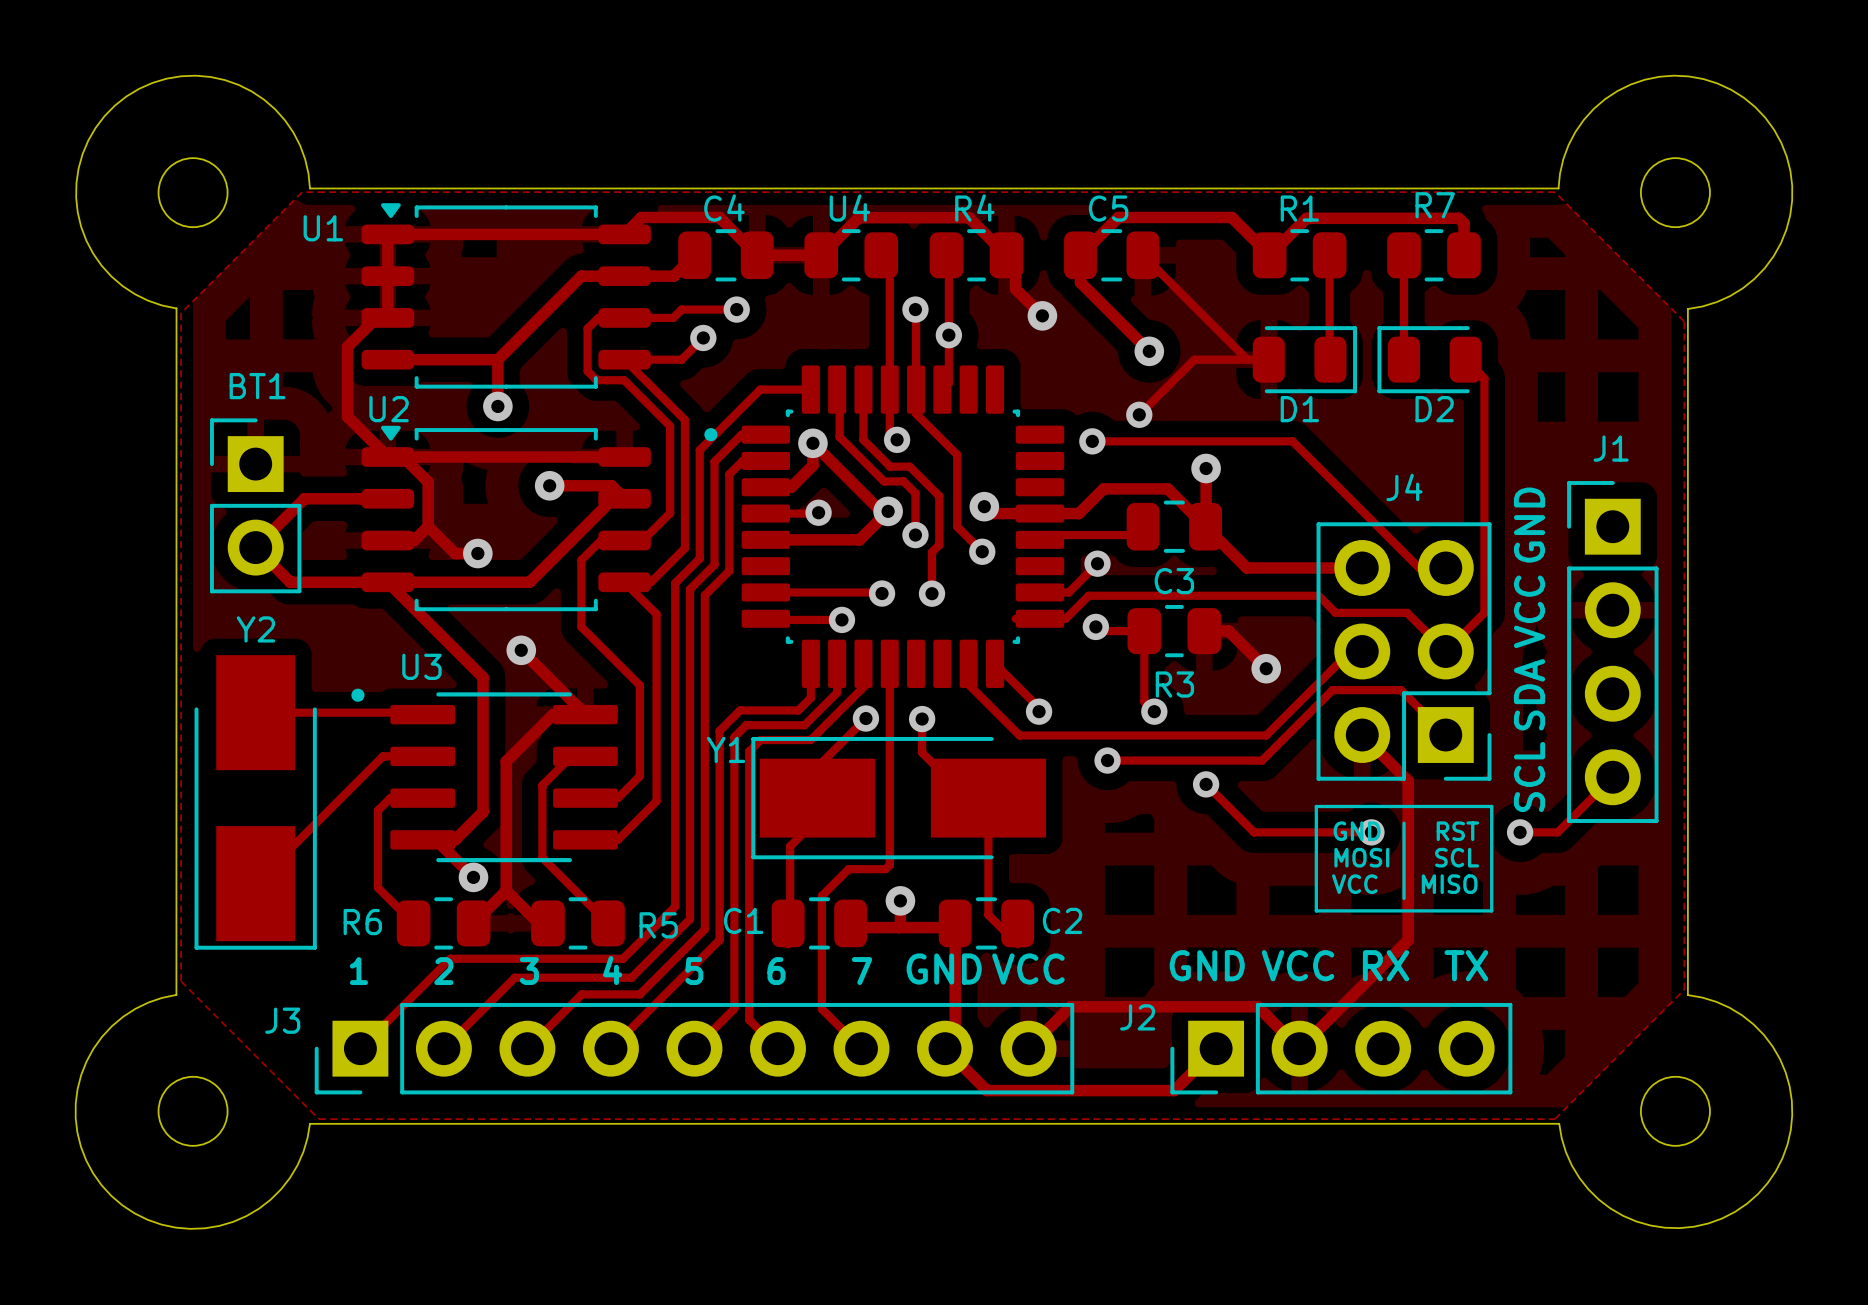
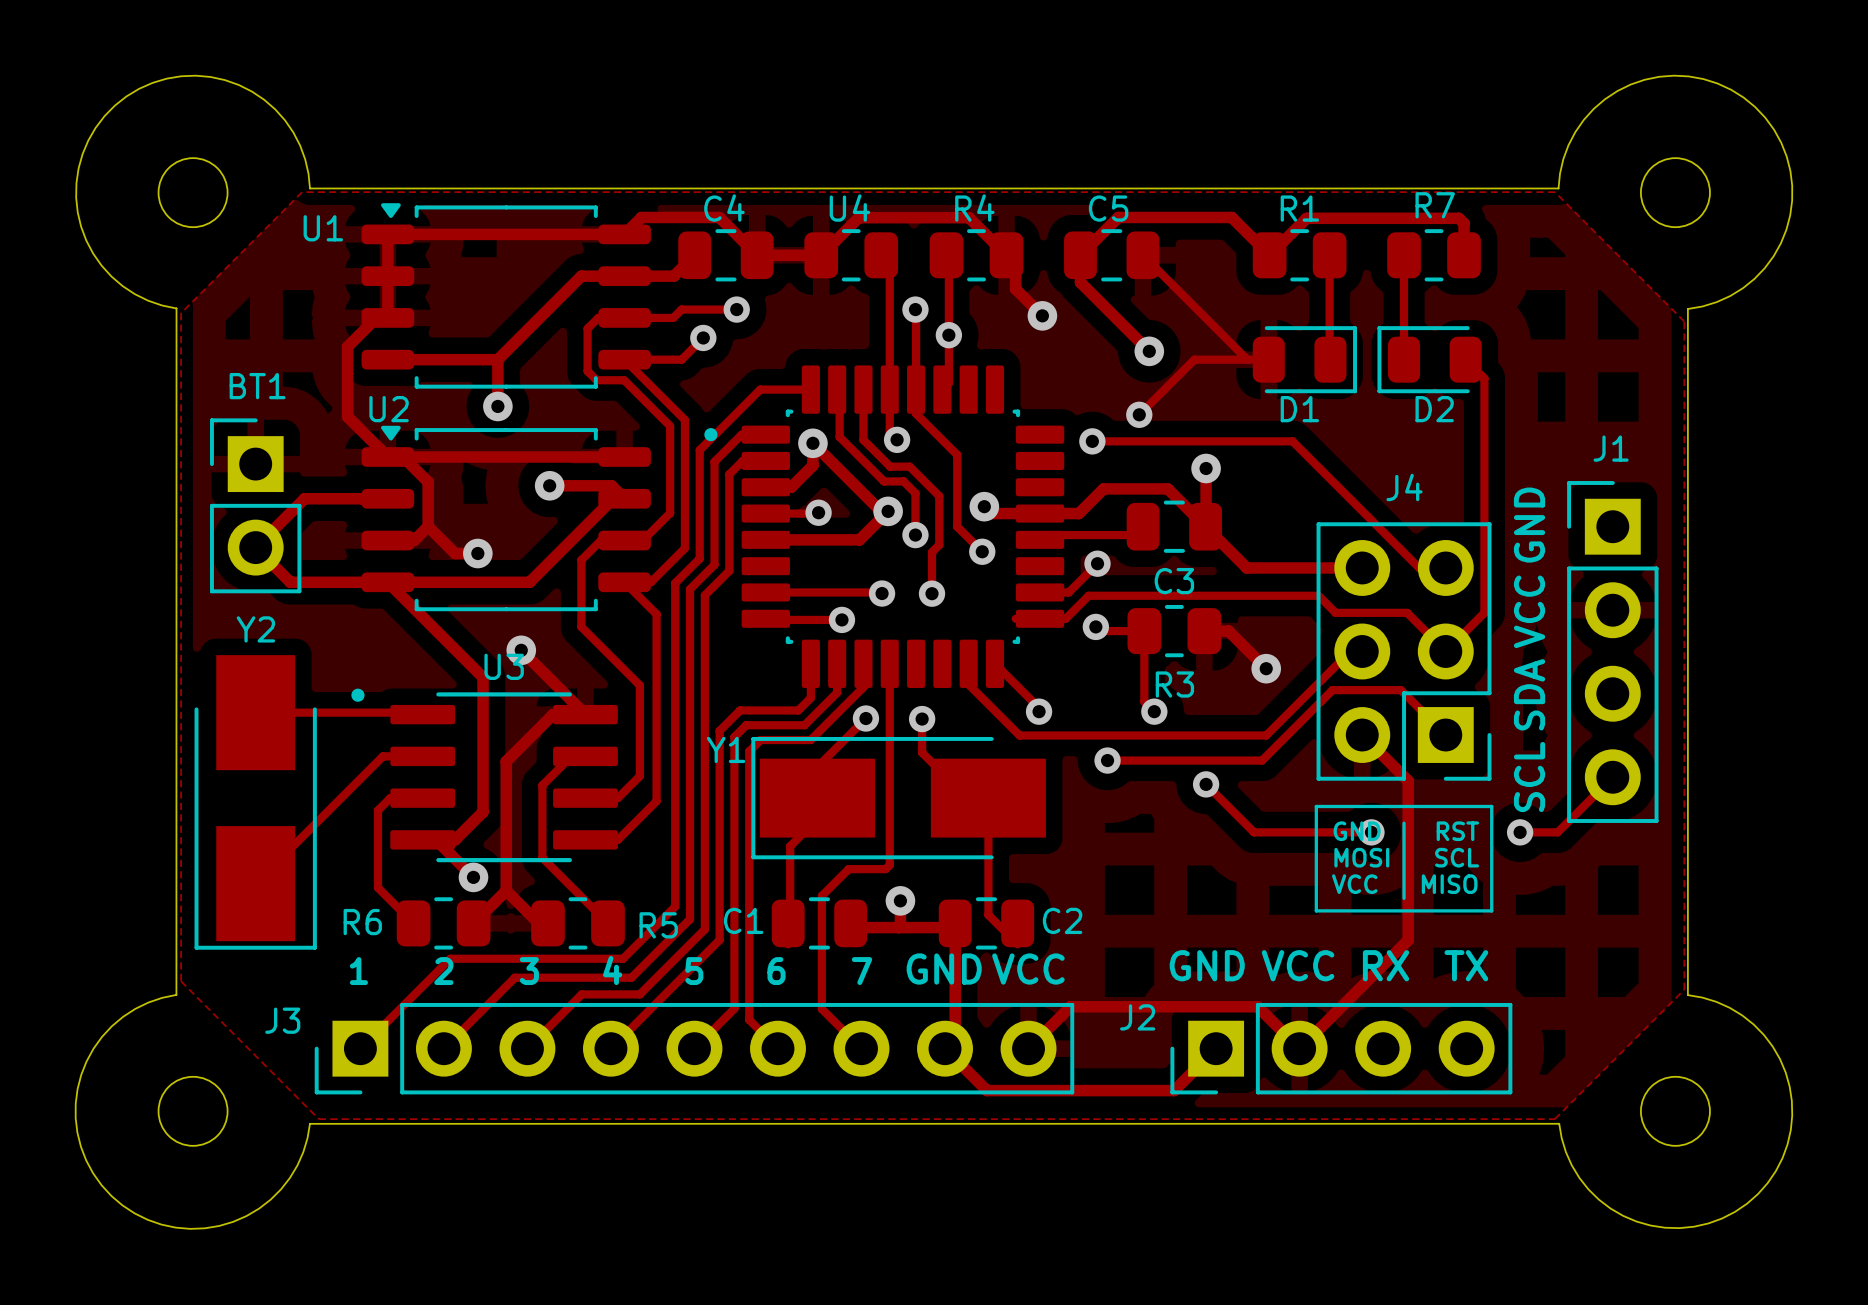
U3 name position: U3 (421, 666) -> U3 (504, 666)

